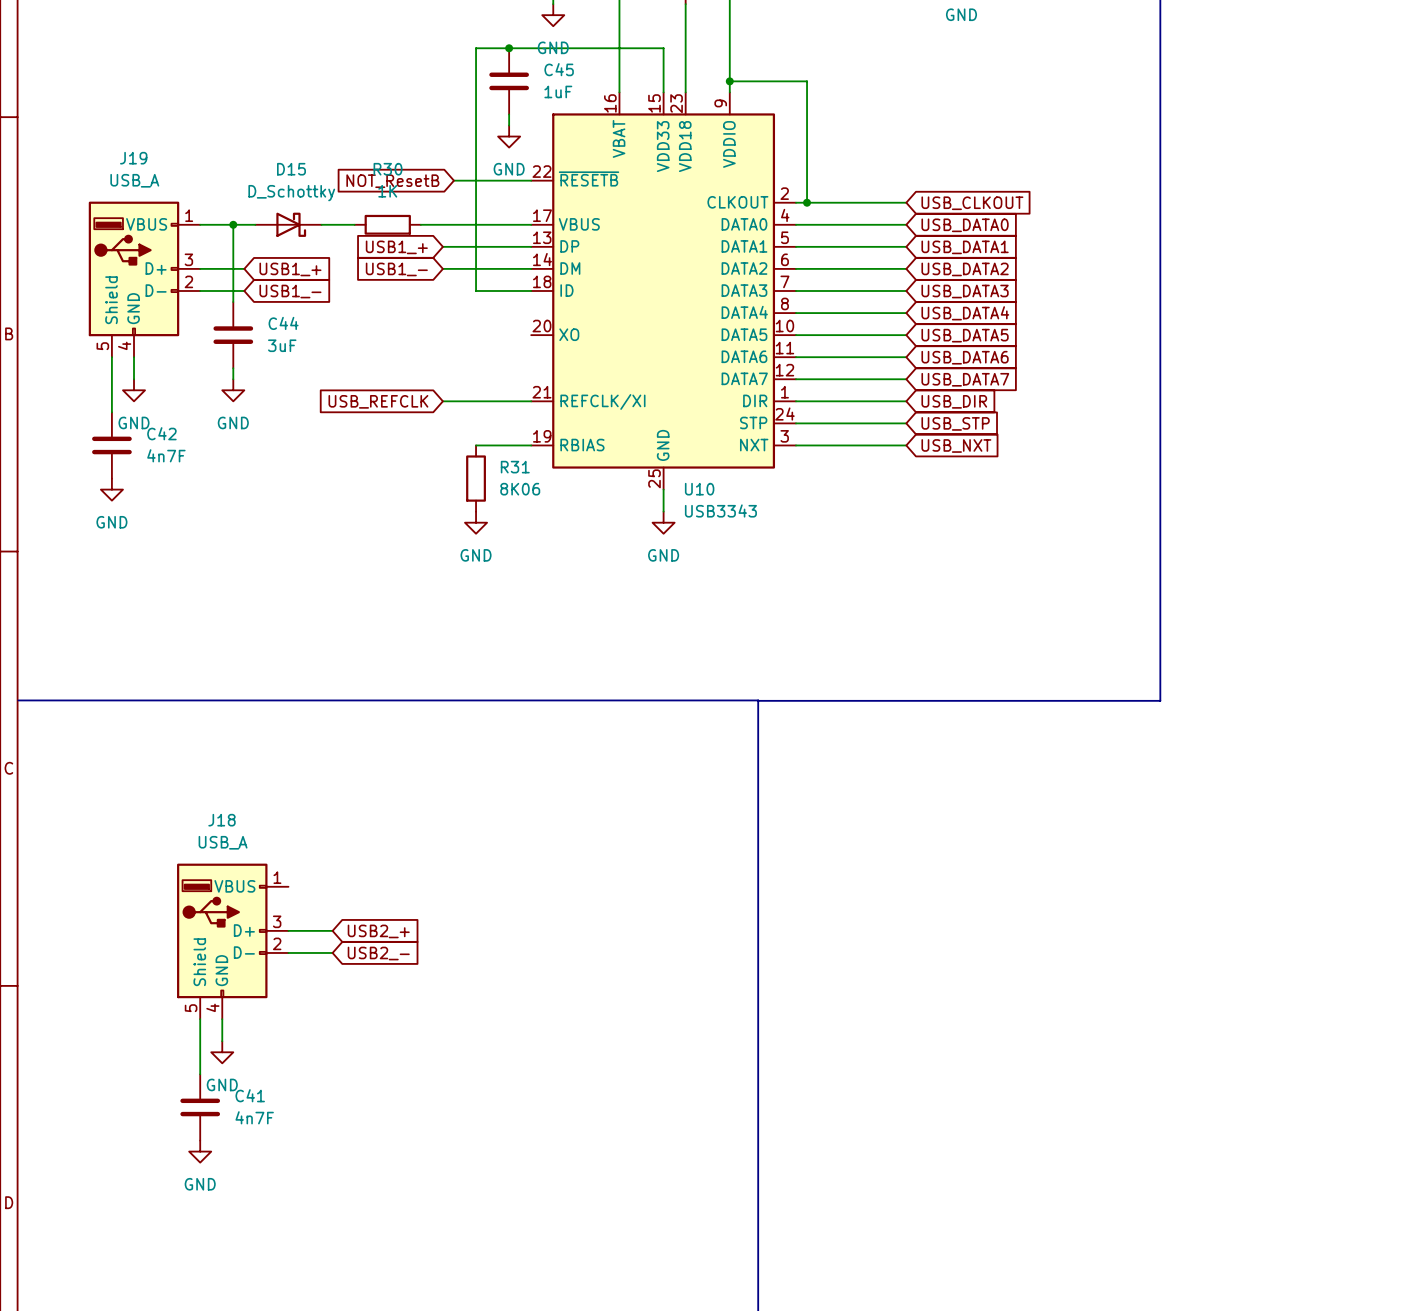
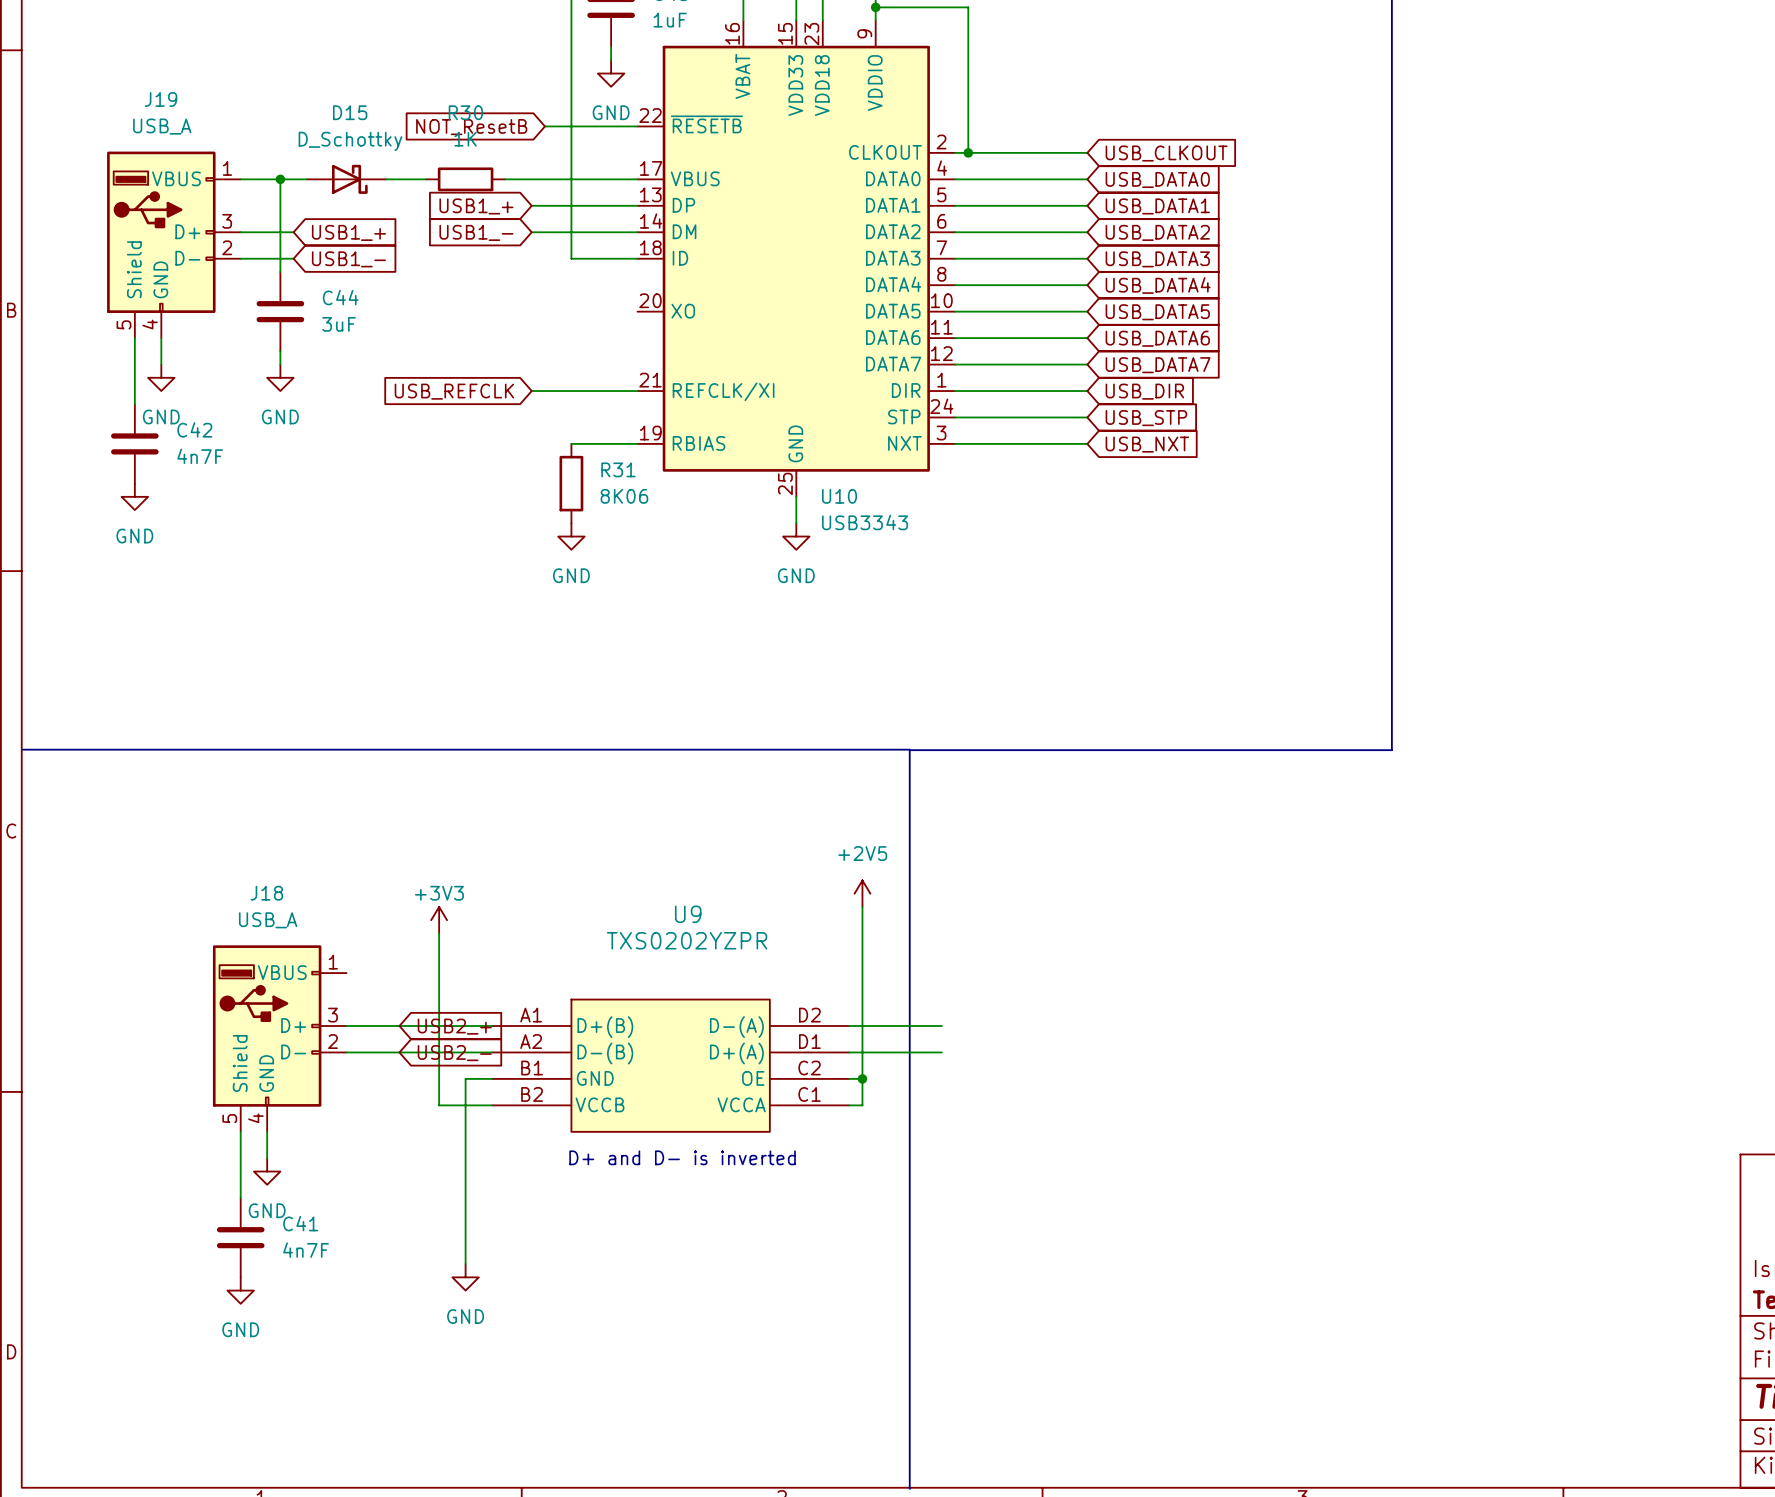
power symbol: none -> +2V5 (862, 893)
wire: none -> (862, 906) (862, 1105) (849, 1105)
power symbol: none -> +3V3 (439, 920)
wire: none -> (439, 933) (439, 1105) (492, 1105)
wire: none -> (399, 1026) (492, 1026)
wire: none -> (849, 1026) (941, 1026)
wire: none -> (399, 1052) (492, 1052)
wire: none -> (849, 1052) (941, 1052)
U9: none -> TXS0202YZPR (670, 1065)
wire: none -> (492, 1078) (465, 1078) (465, 1264)
wire: none -> (849, 1078) (862, 1078)
junction: none -> (862, 1078)
text: none -> D+ and D- is inverted (682, 1157)
power symbol: none -> GND (465, 1277)

